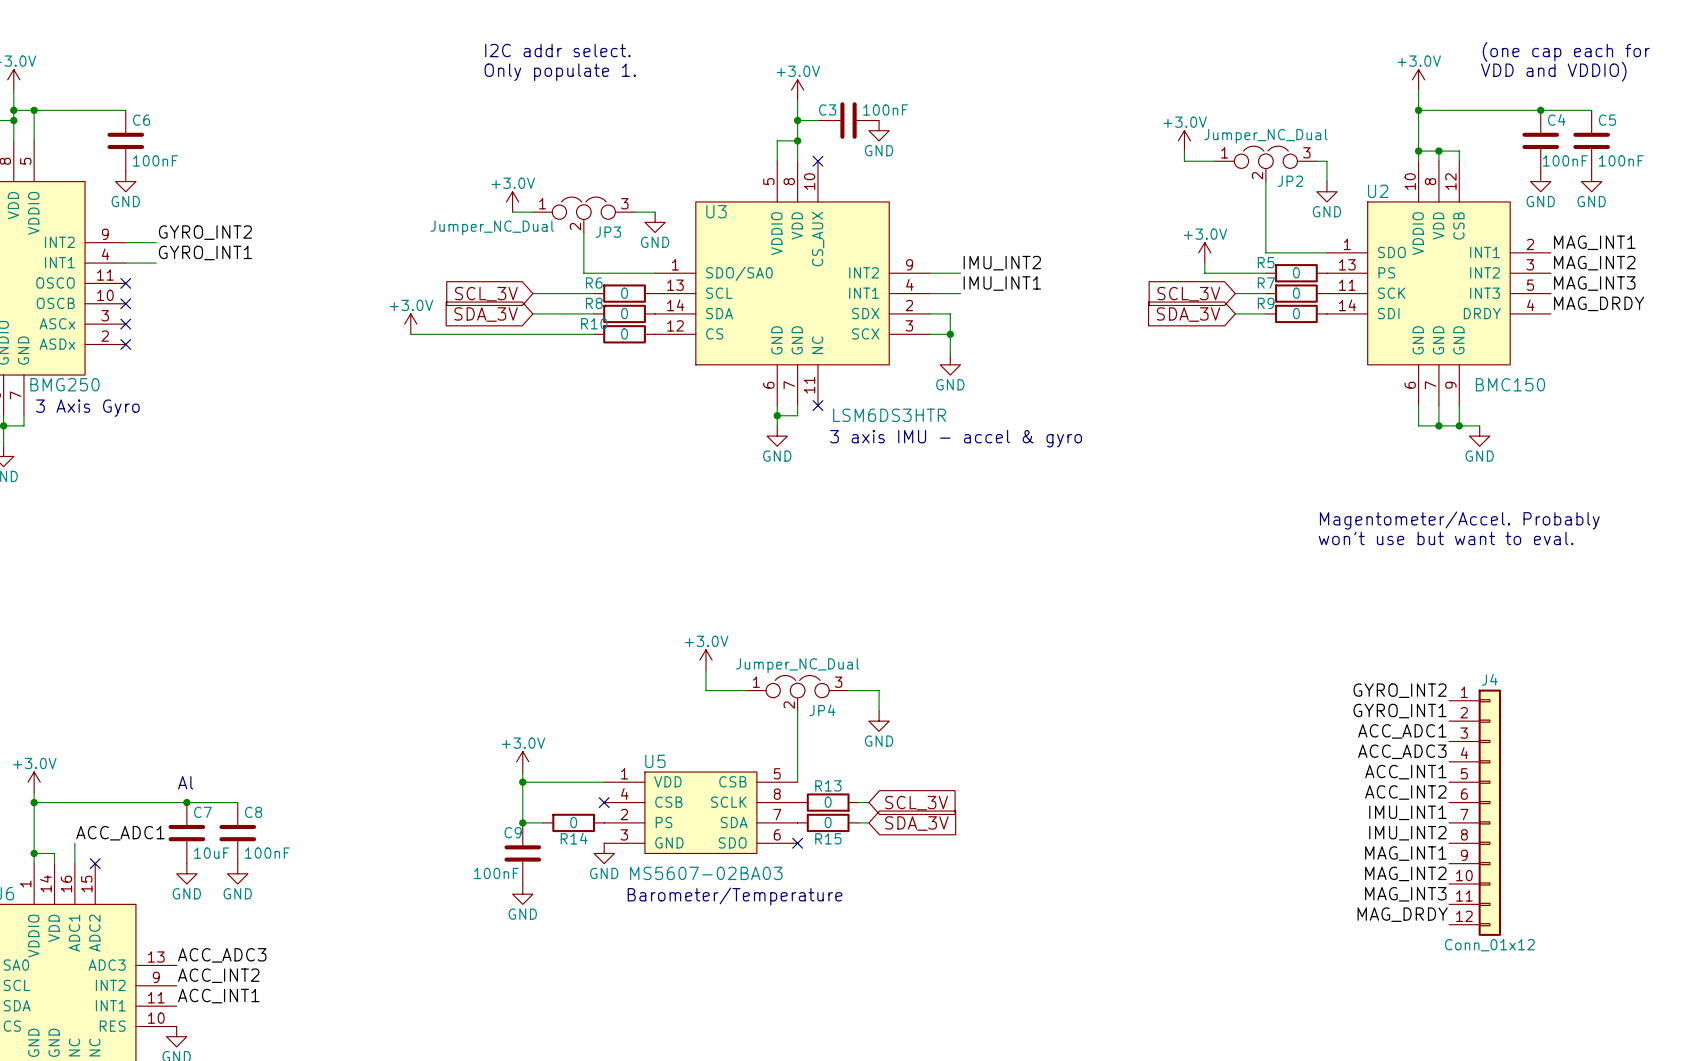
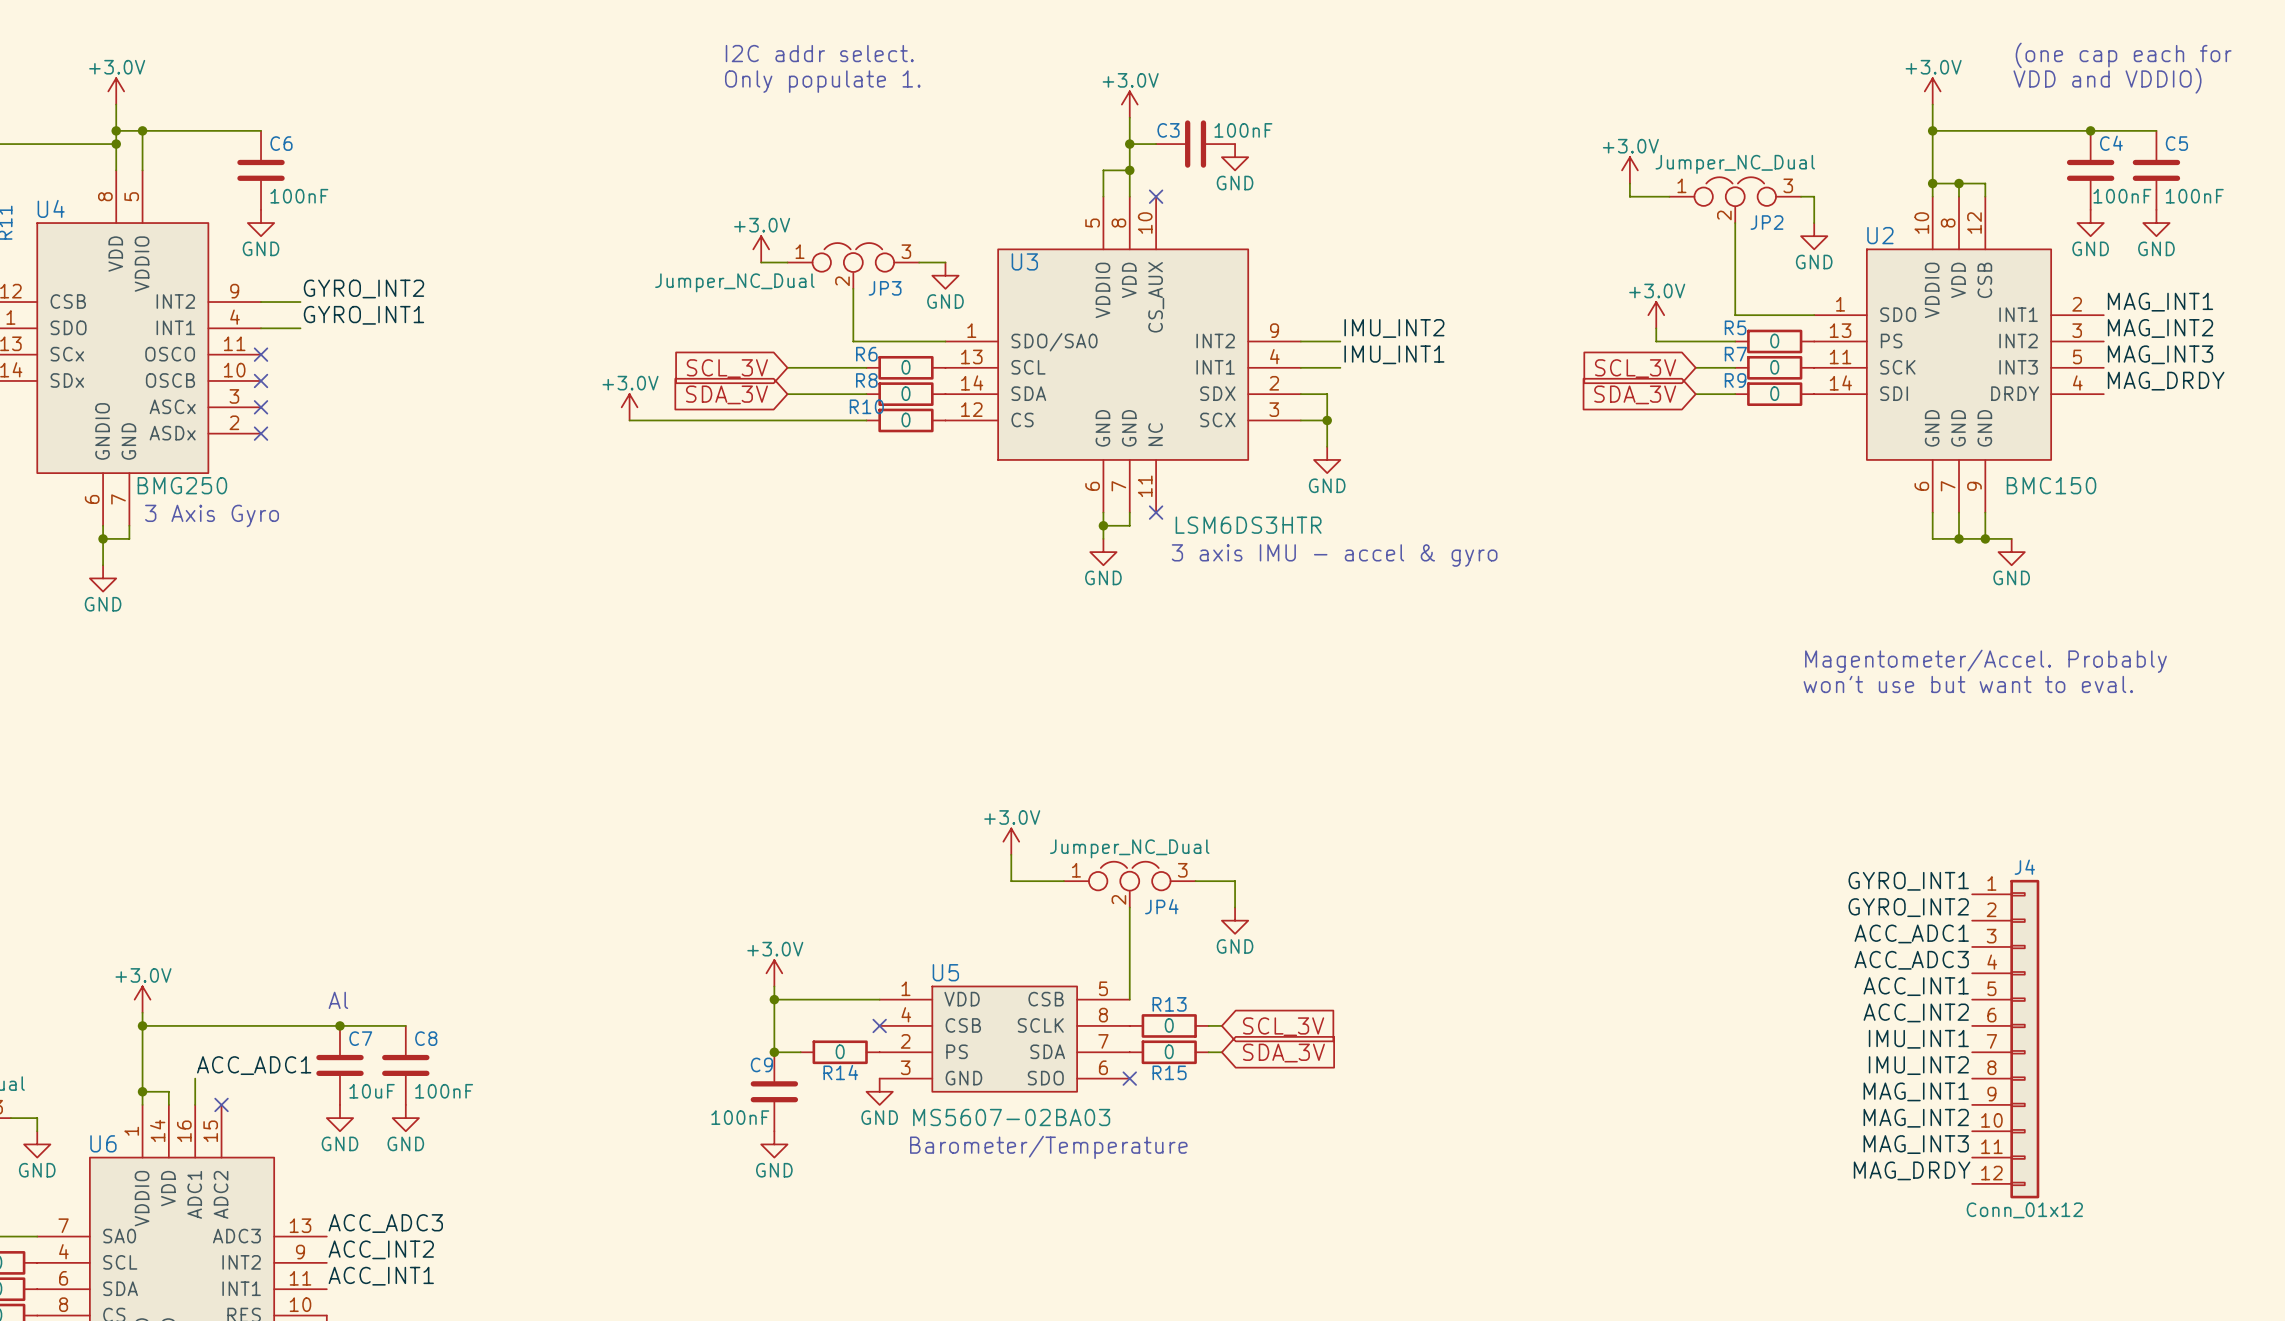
label: GYRO_INT2 (1400, 690) -> GYRO_INT1 (1908, 881)
label: GYRO_INT1 (1400, 711) -> GYRO_INT2 (1908, 907)

